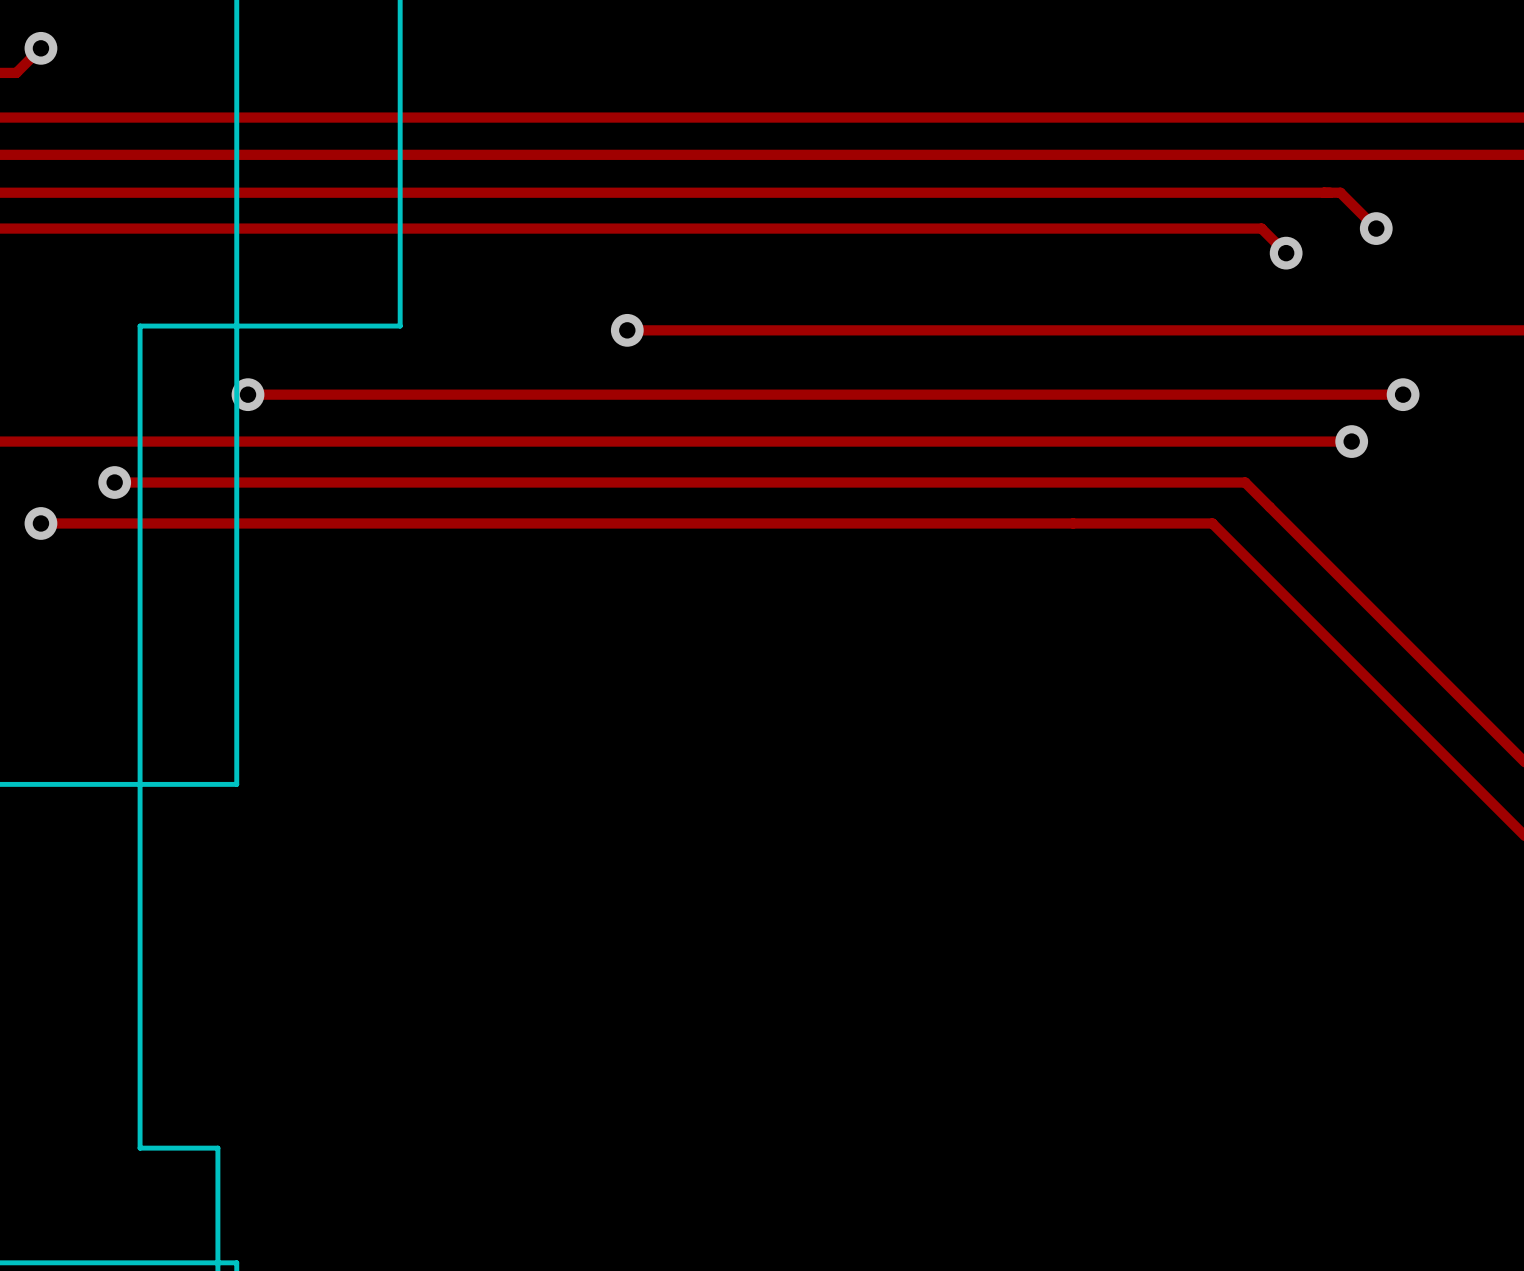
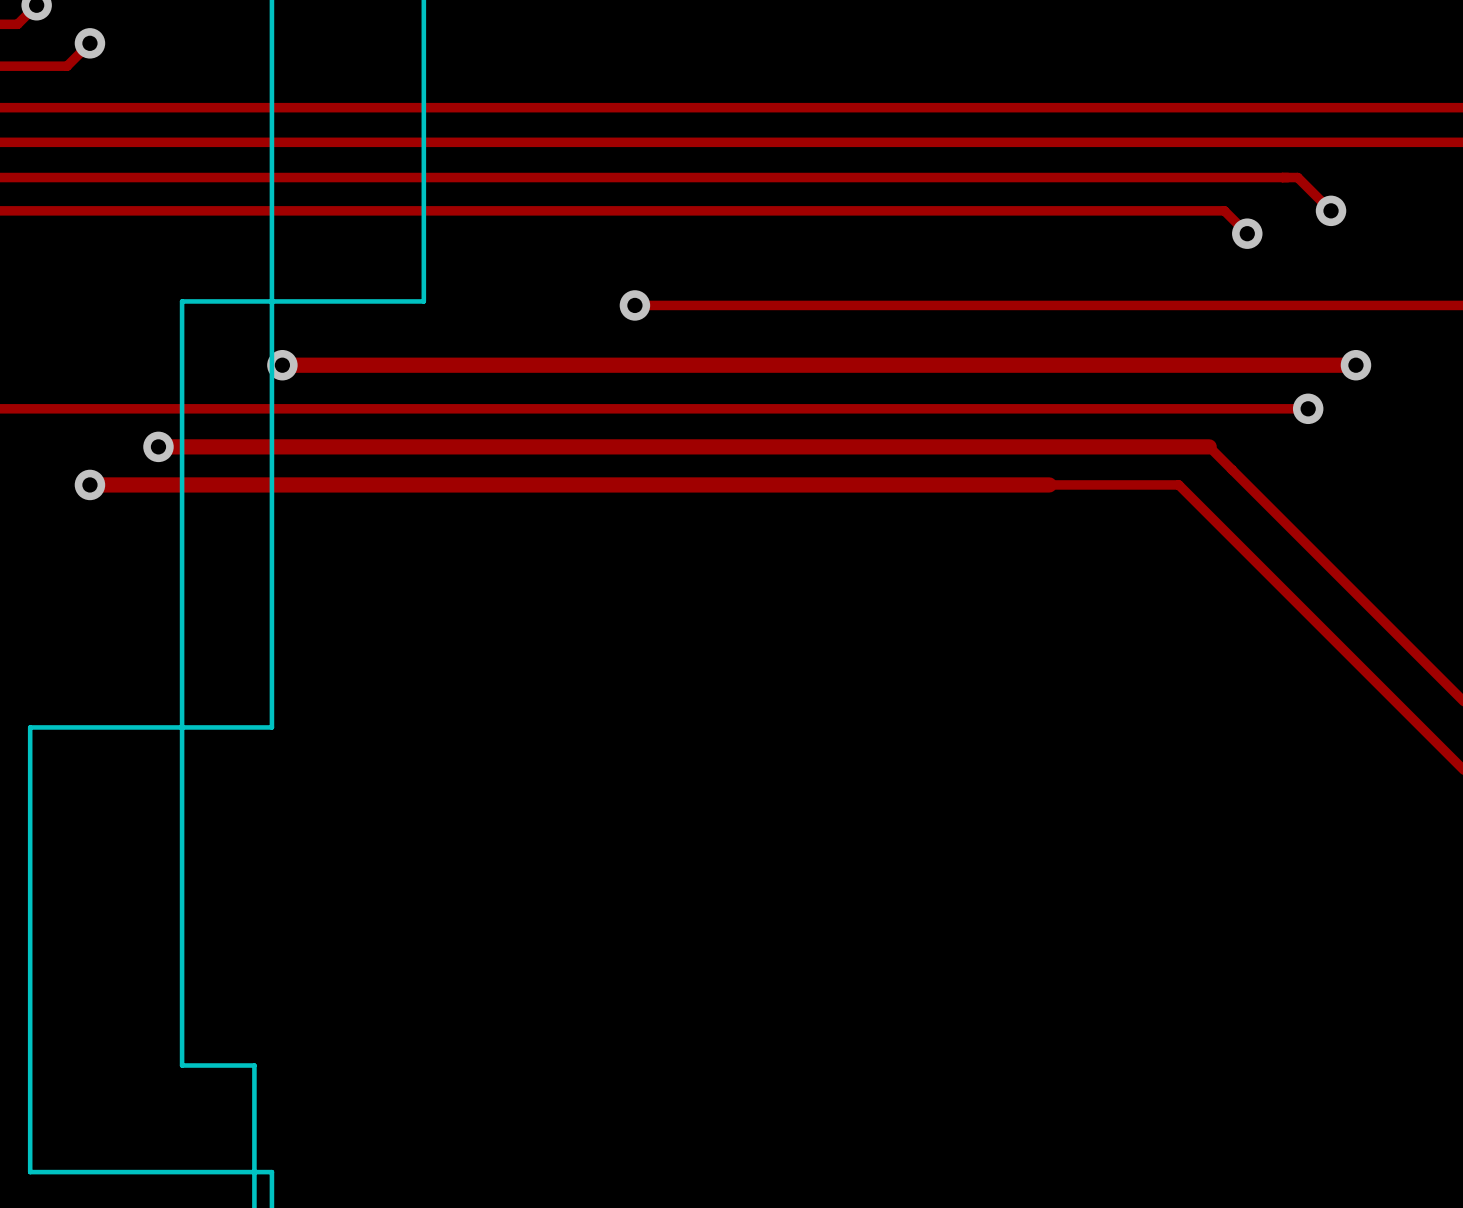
track width: thin (248, 394) (1403, 394) -> thick (282, 365) (1355, 365)
track width: thin (114, 482) (1245, 482) -> thick (158, 446) (1209, 446)
track width: thin (40, 523) (1073, 523) -> thick (89, 484) (1049, 484)

